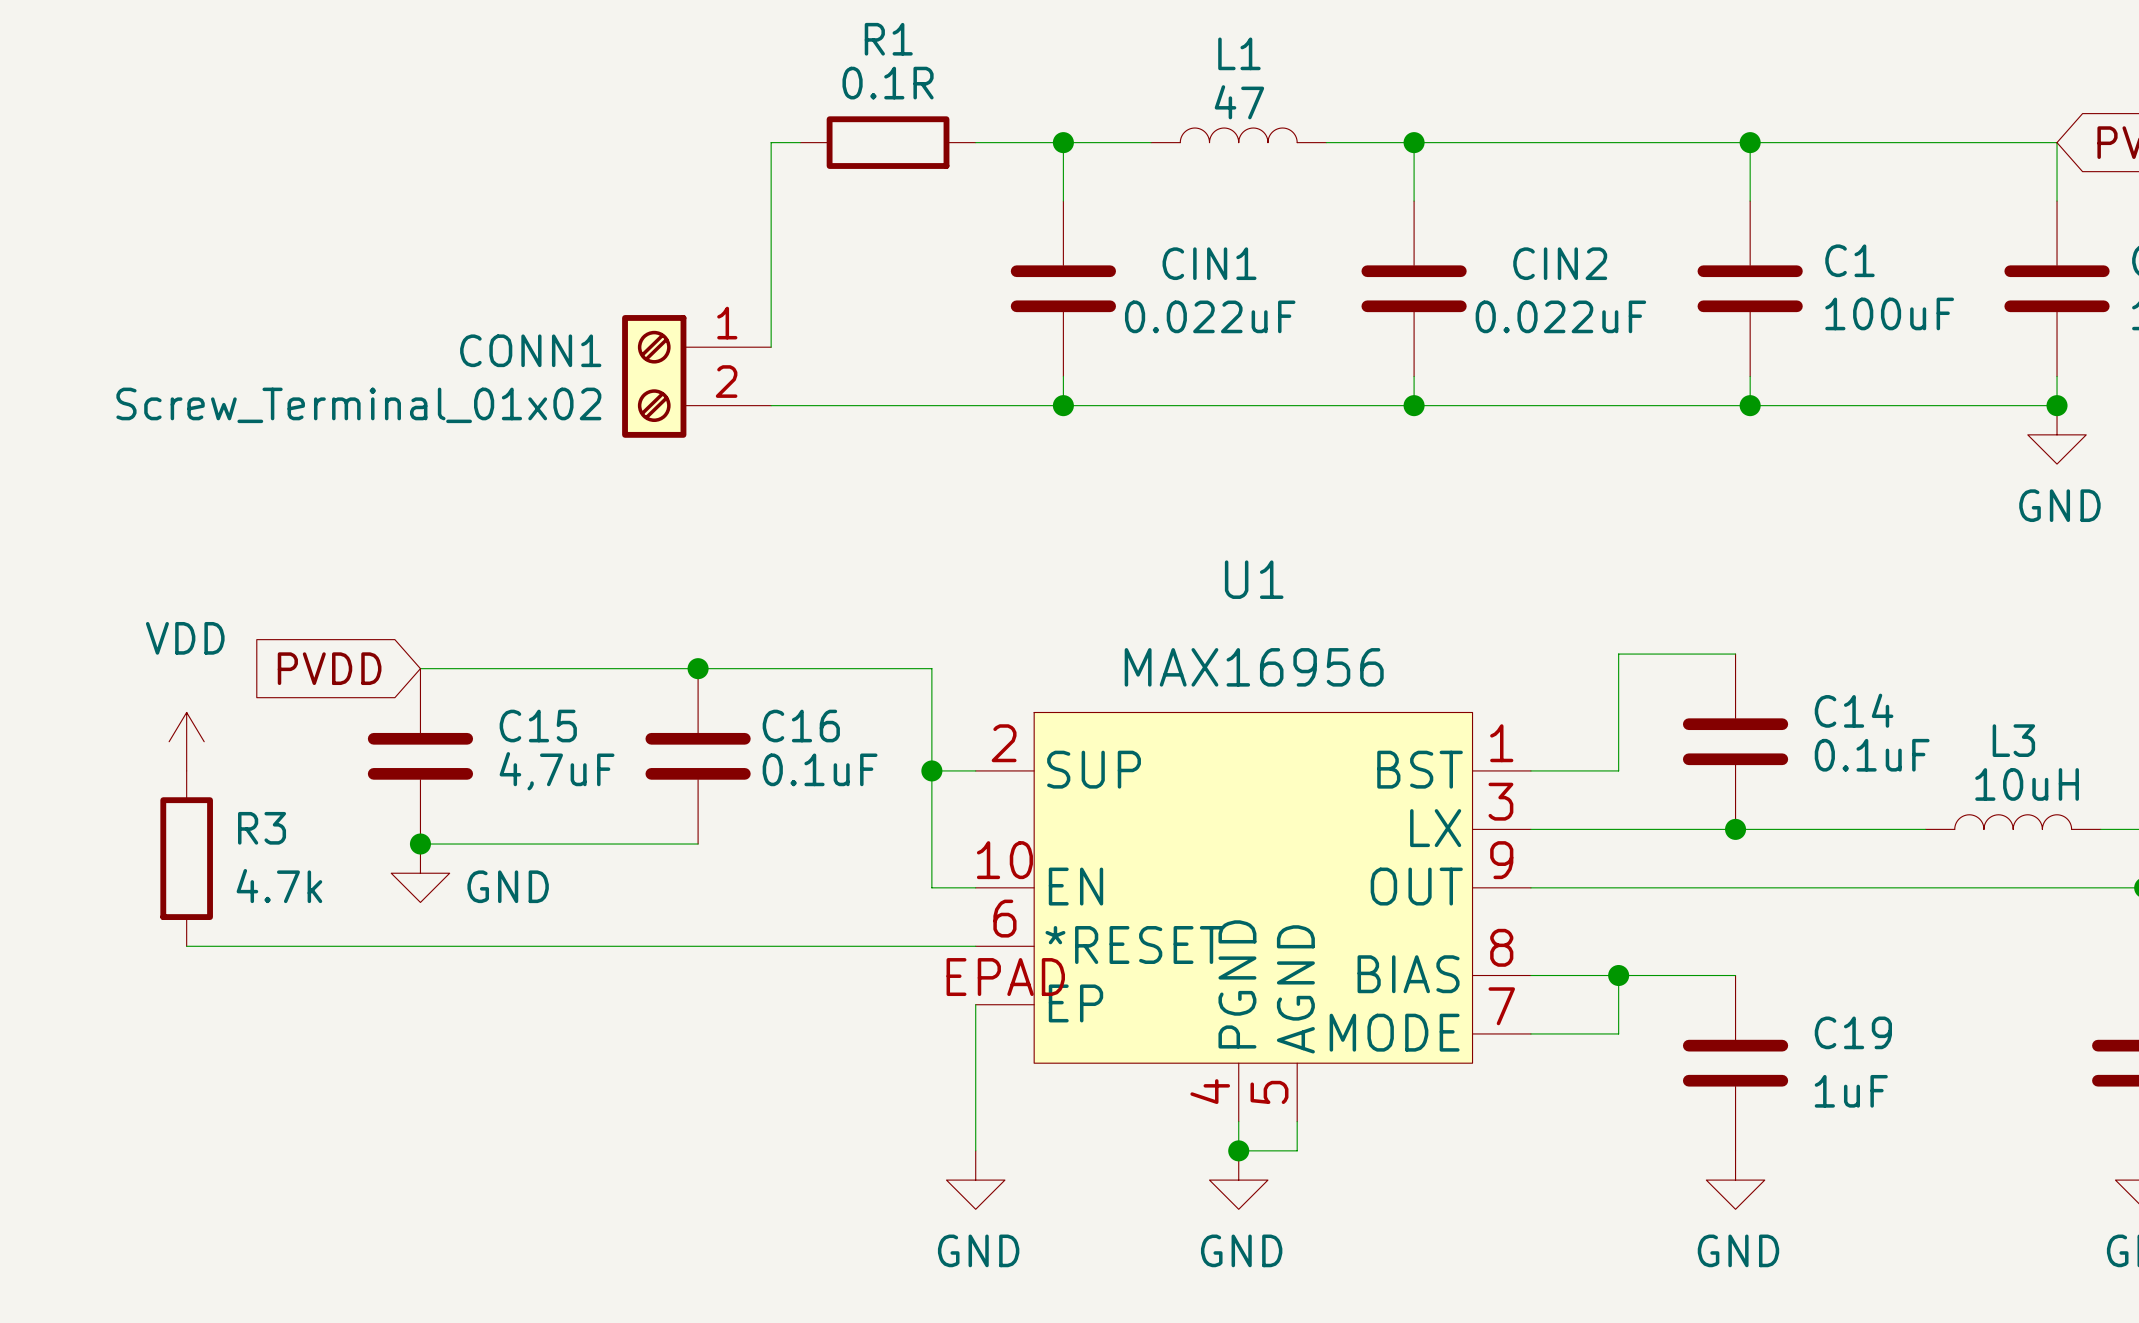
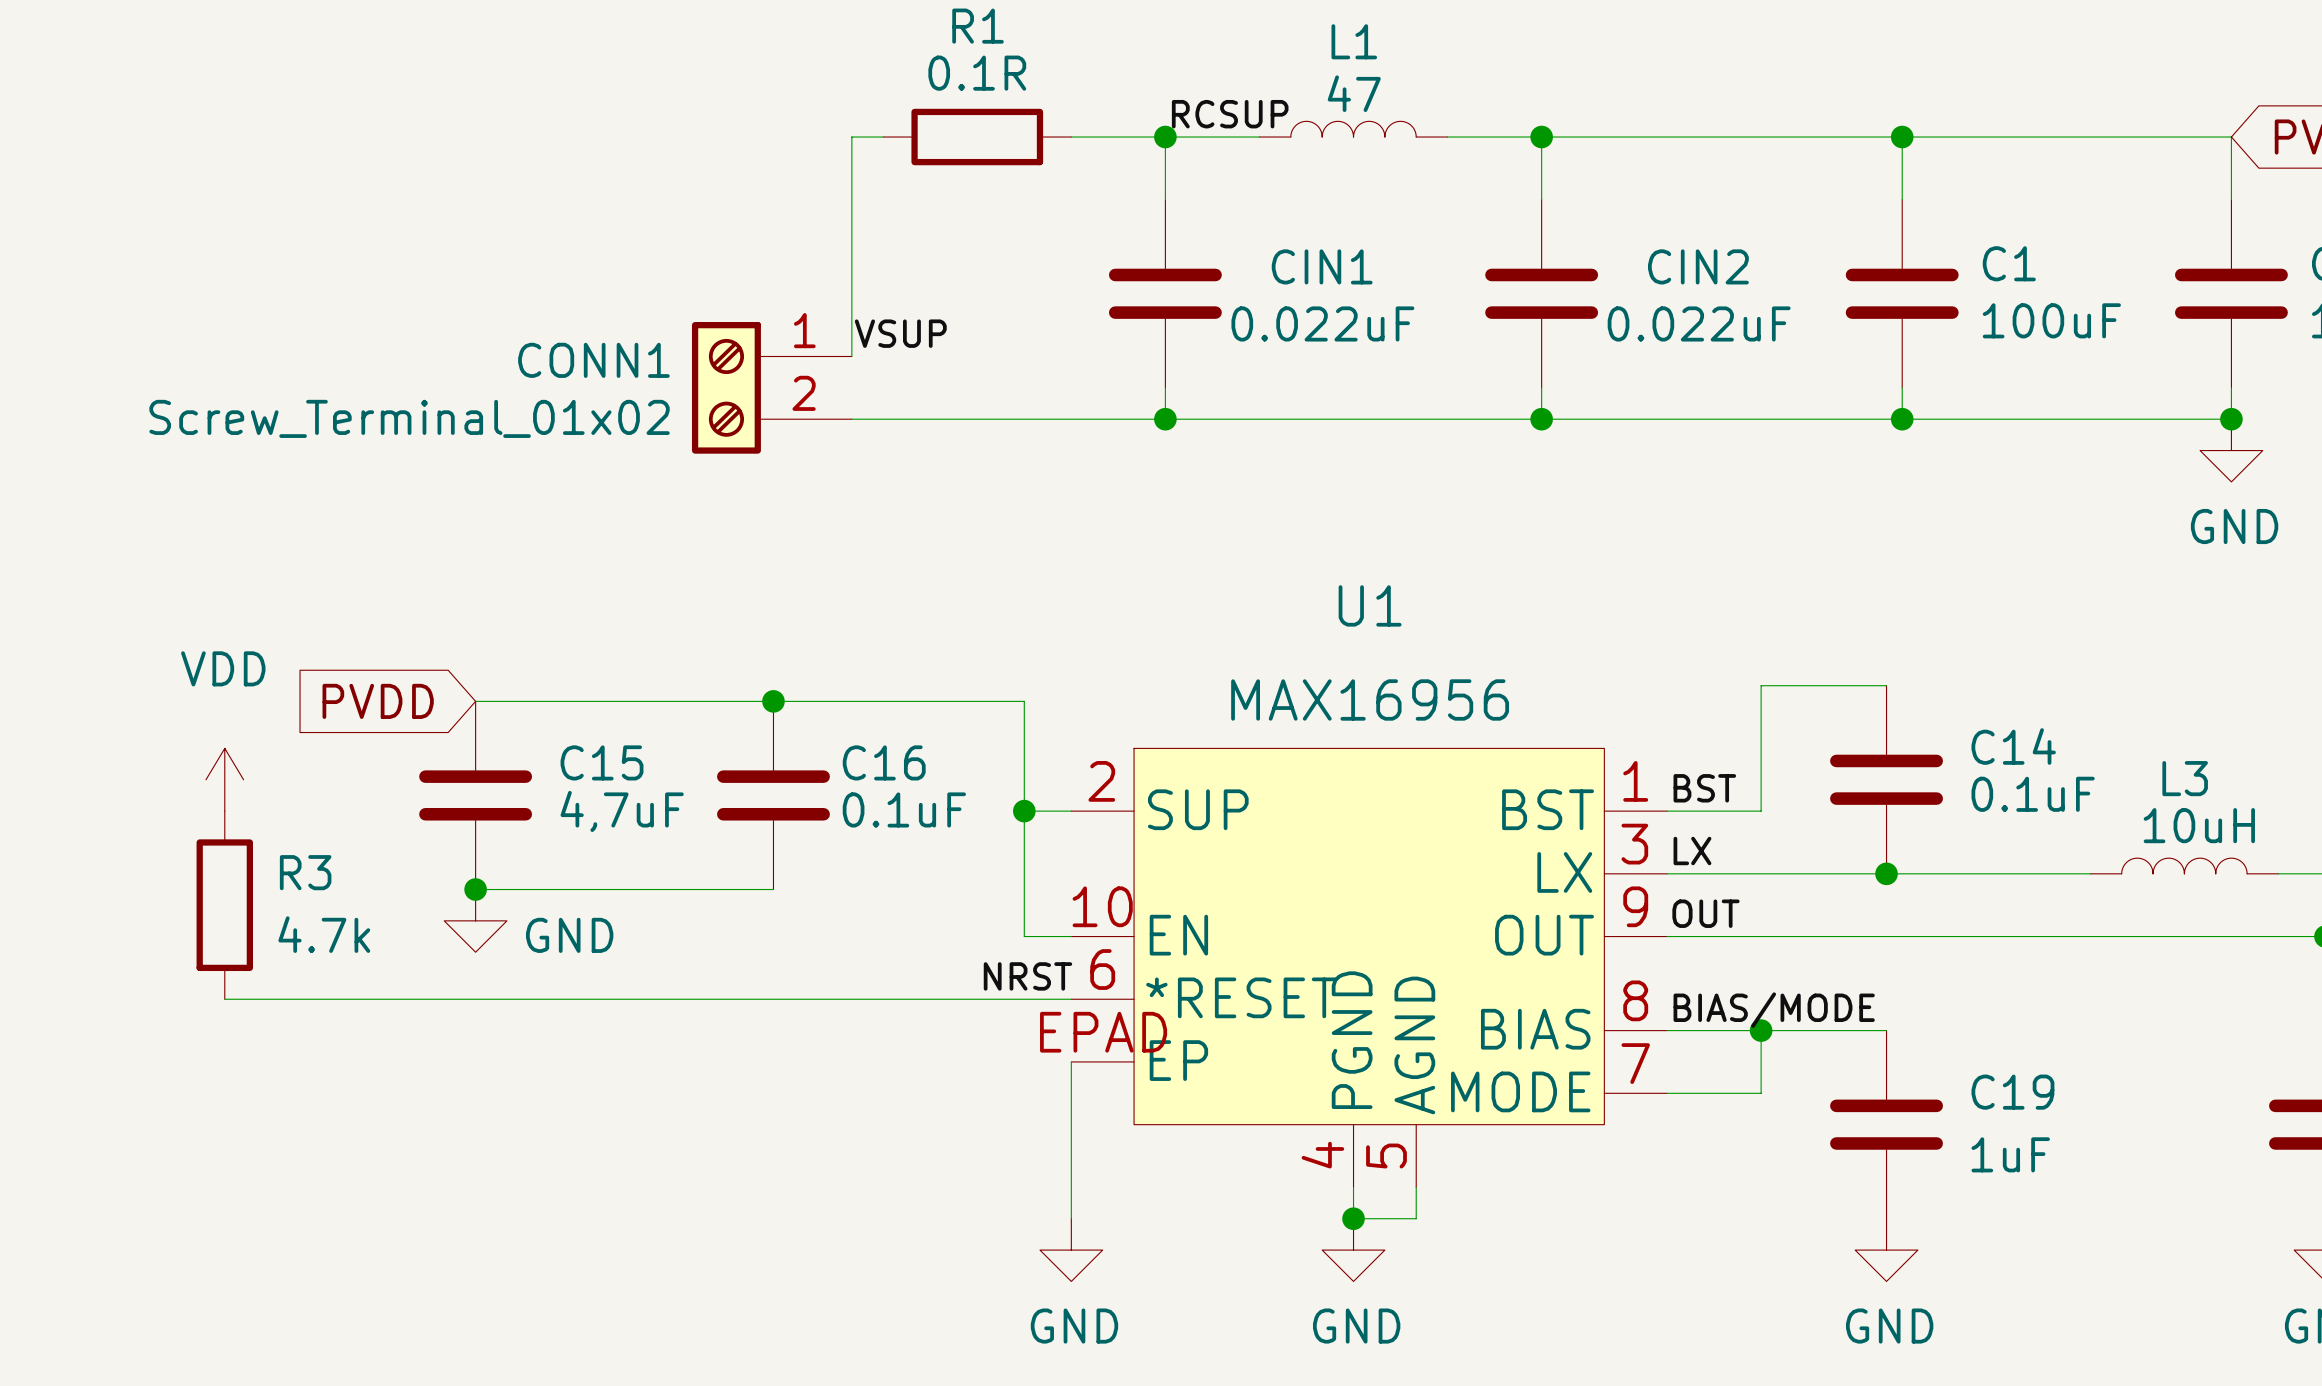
label: none -> RCSUP (1230, 114)
label: none -> VSUP (900, 333)
label: none -> BST (1704, 788)
label: none -> LX (1692, 851)
label: none -> OUT (1705, 913)
label: none -> NRST (1027, 976)
label: none -> BIAS/MODE (1774, 1010)

